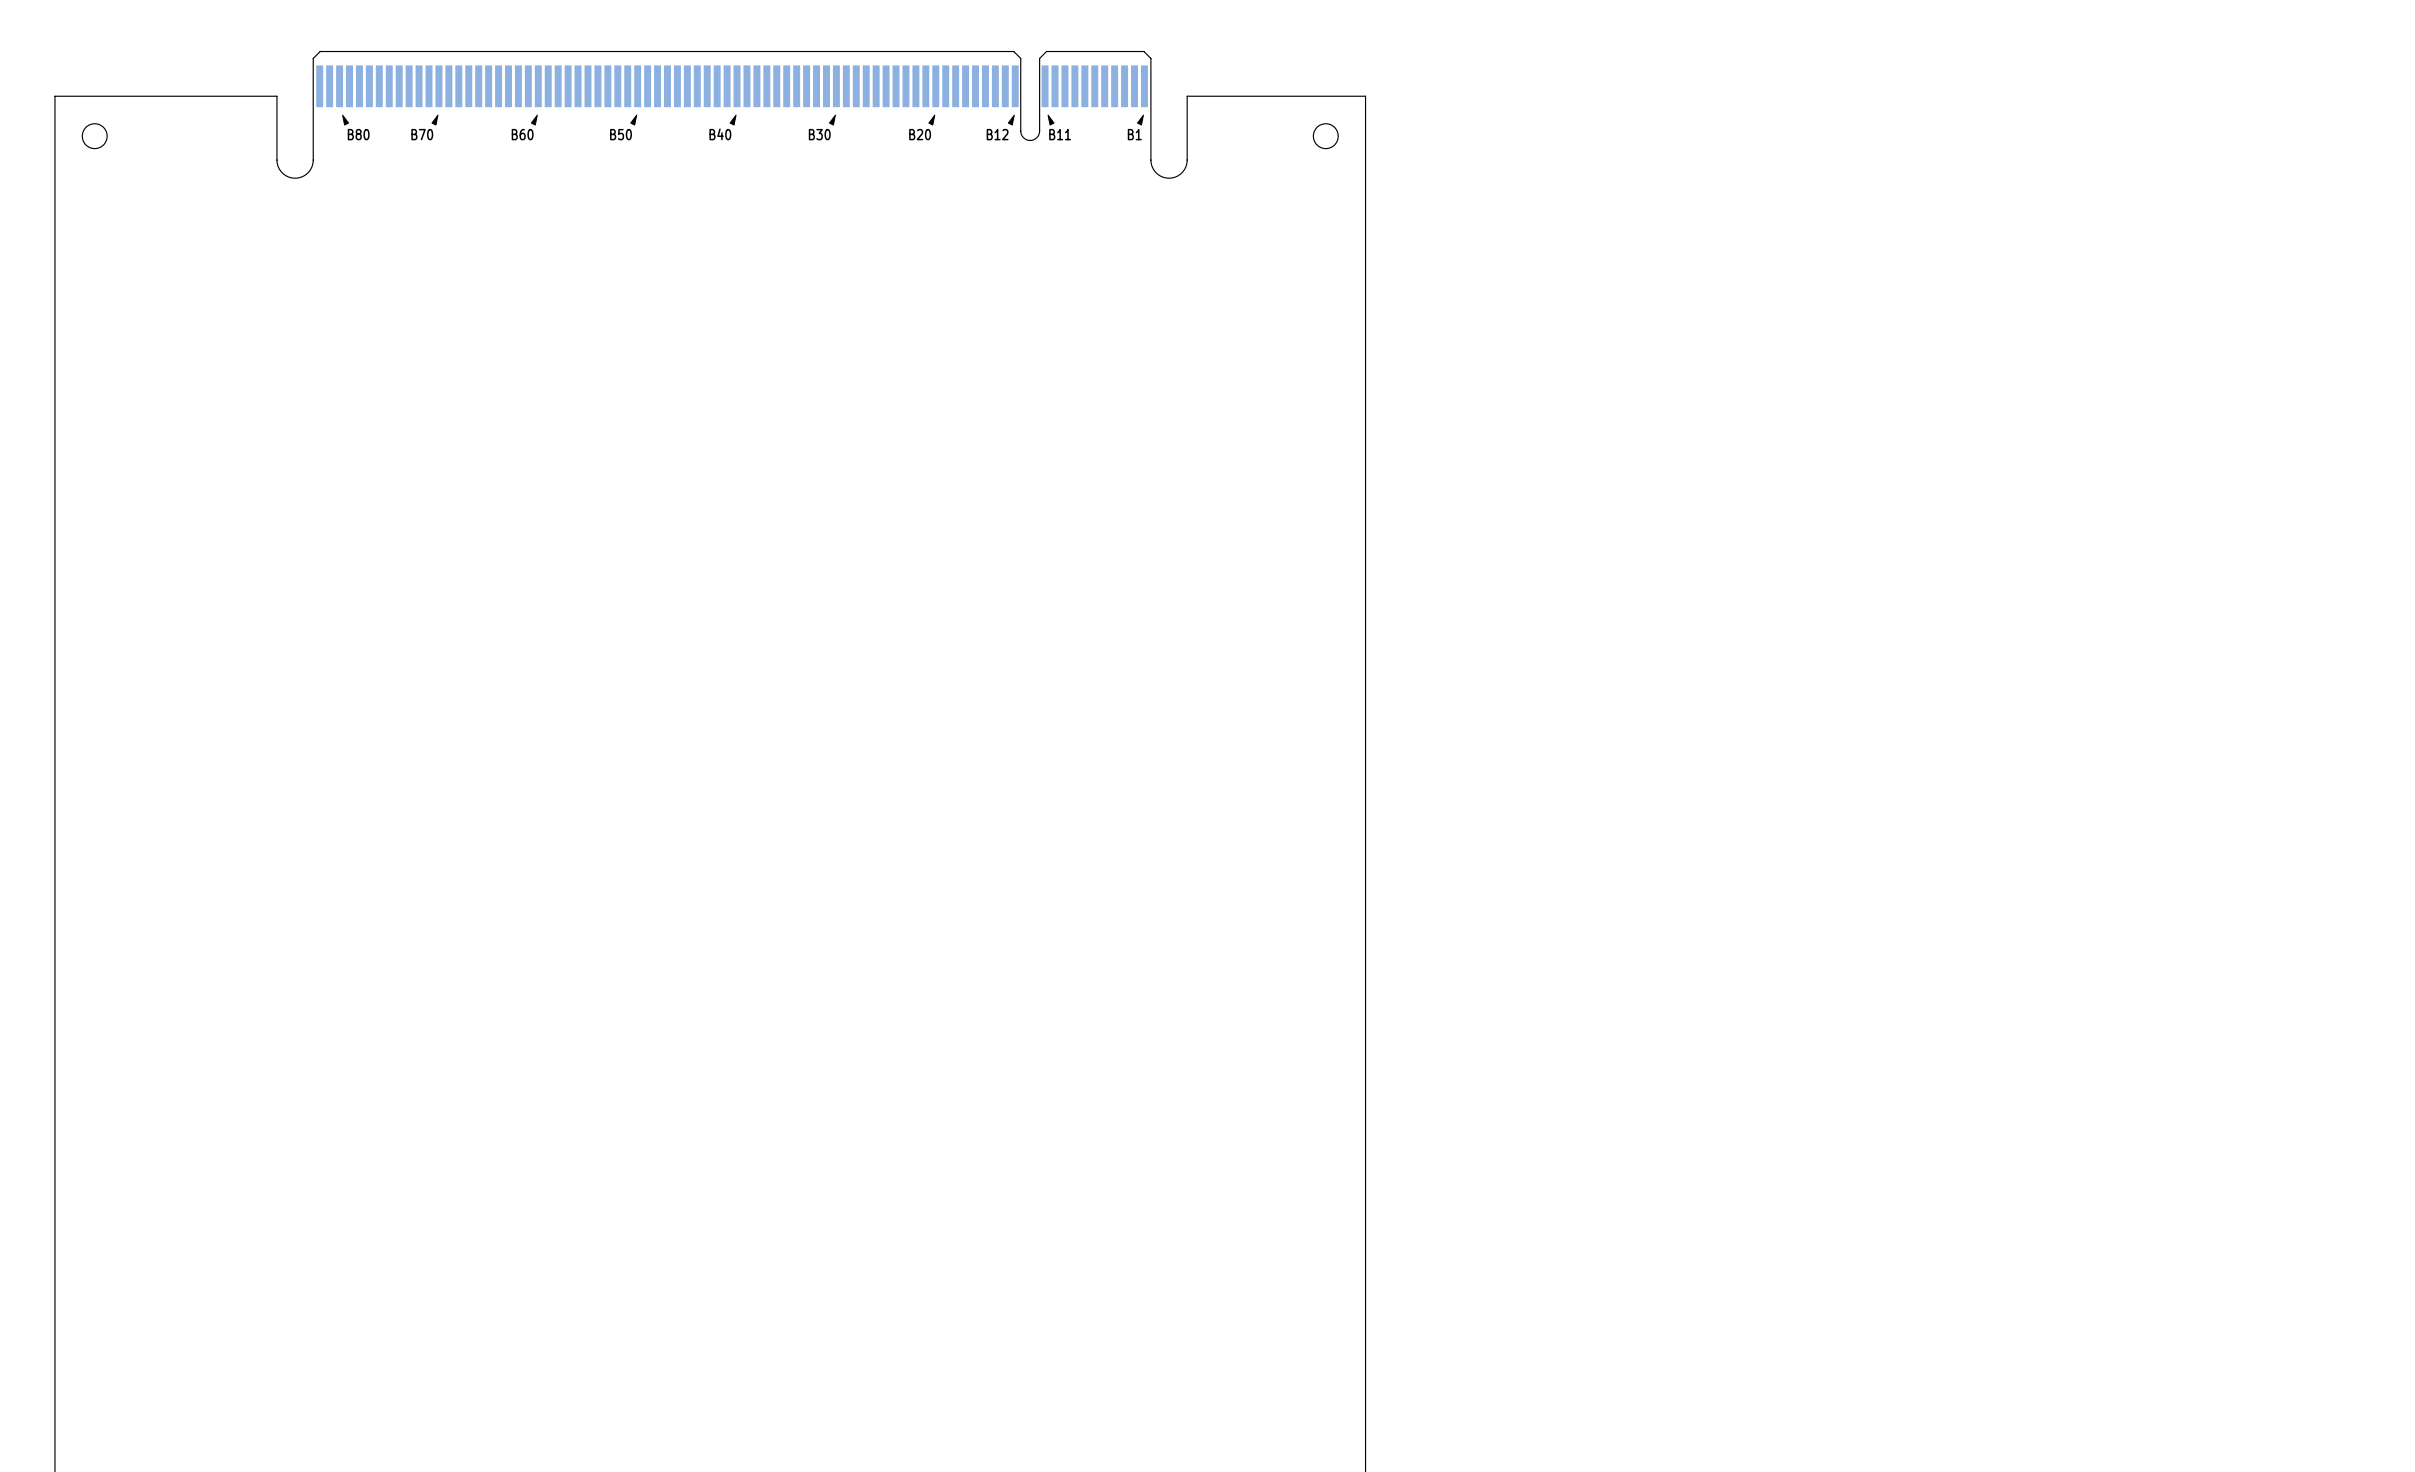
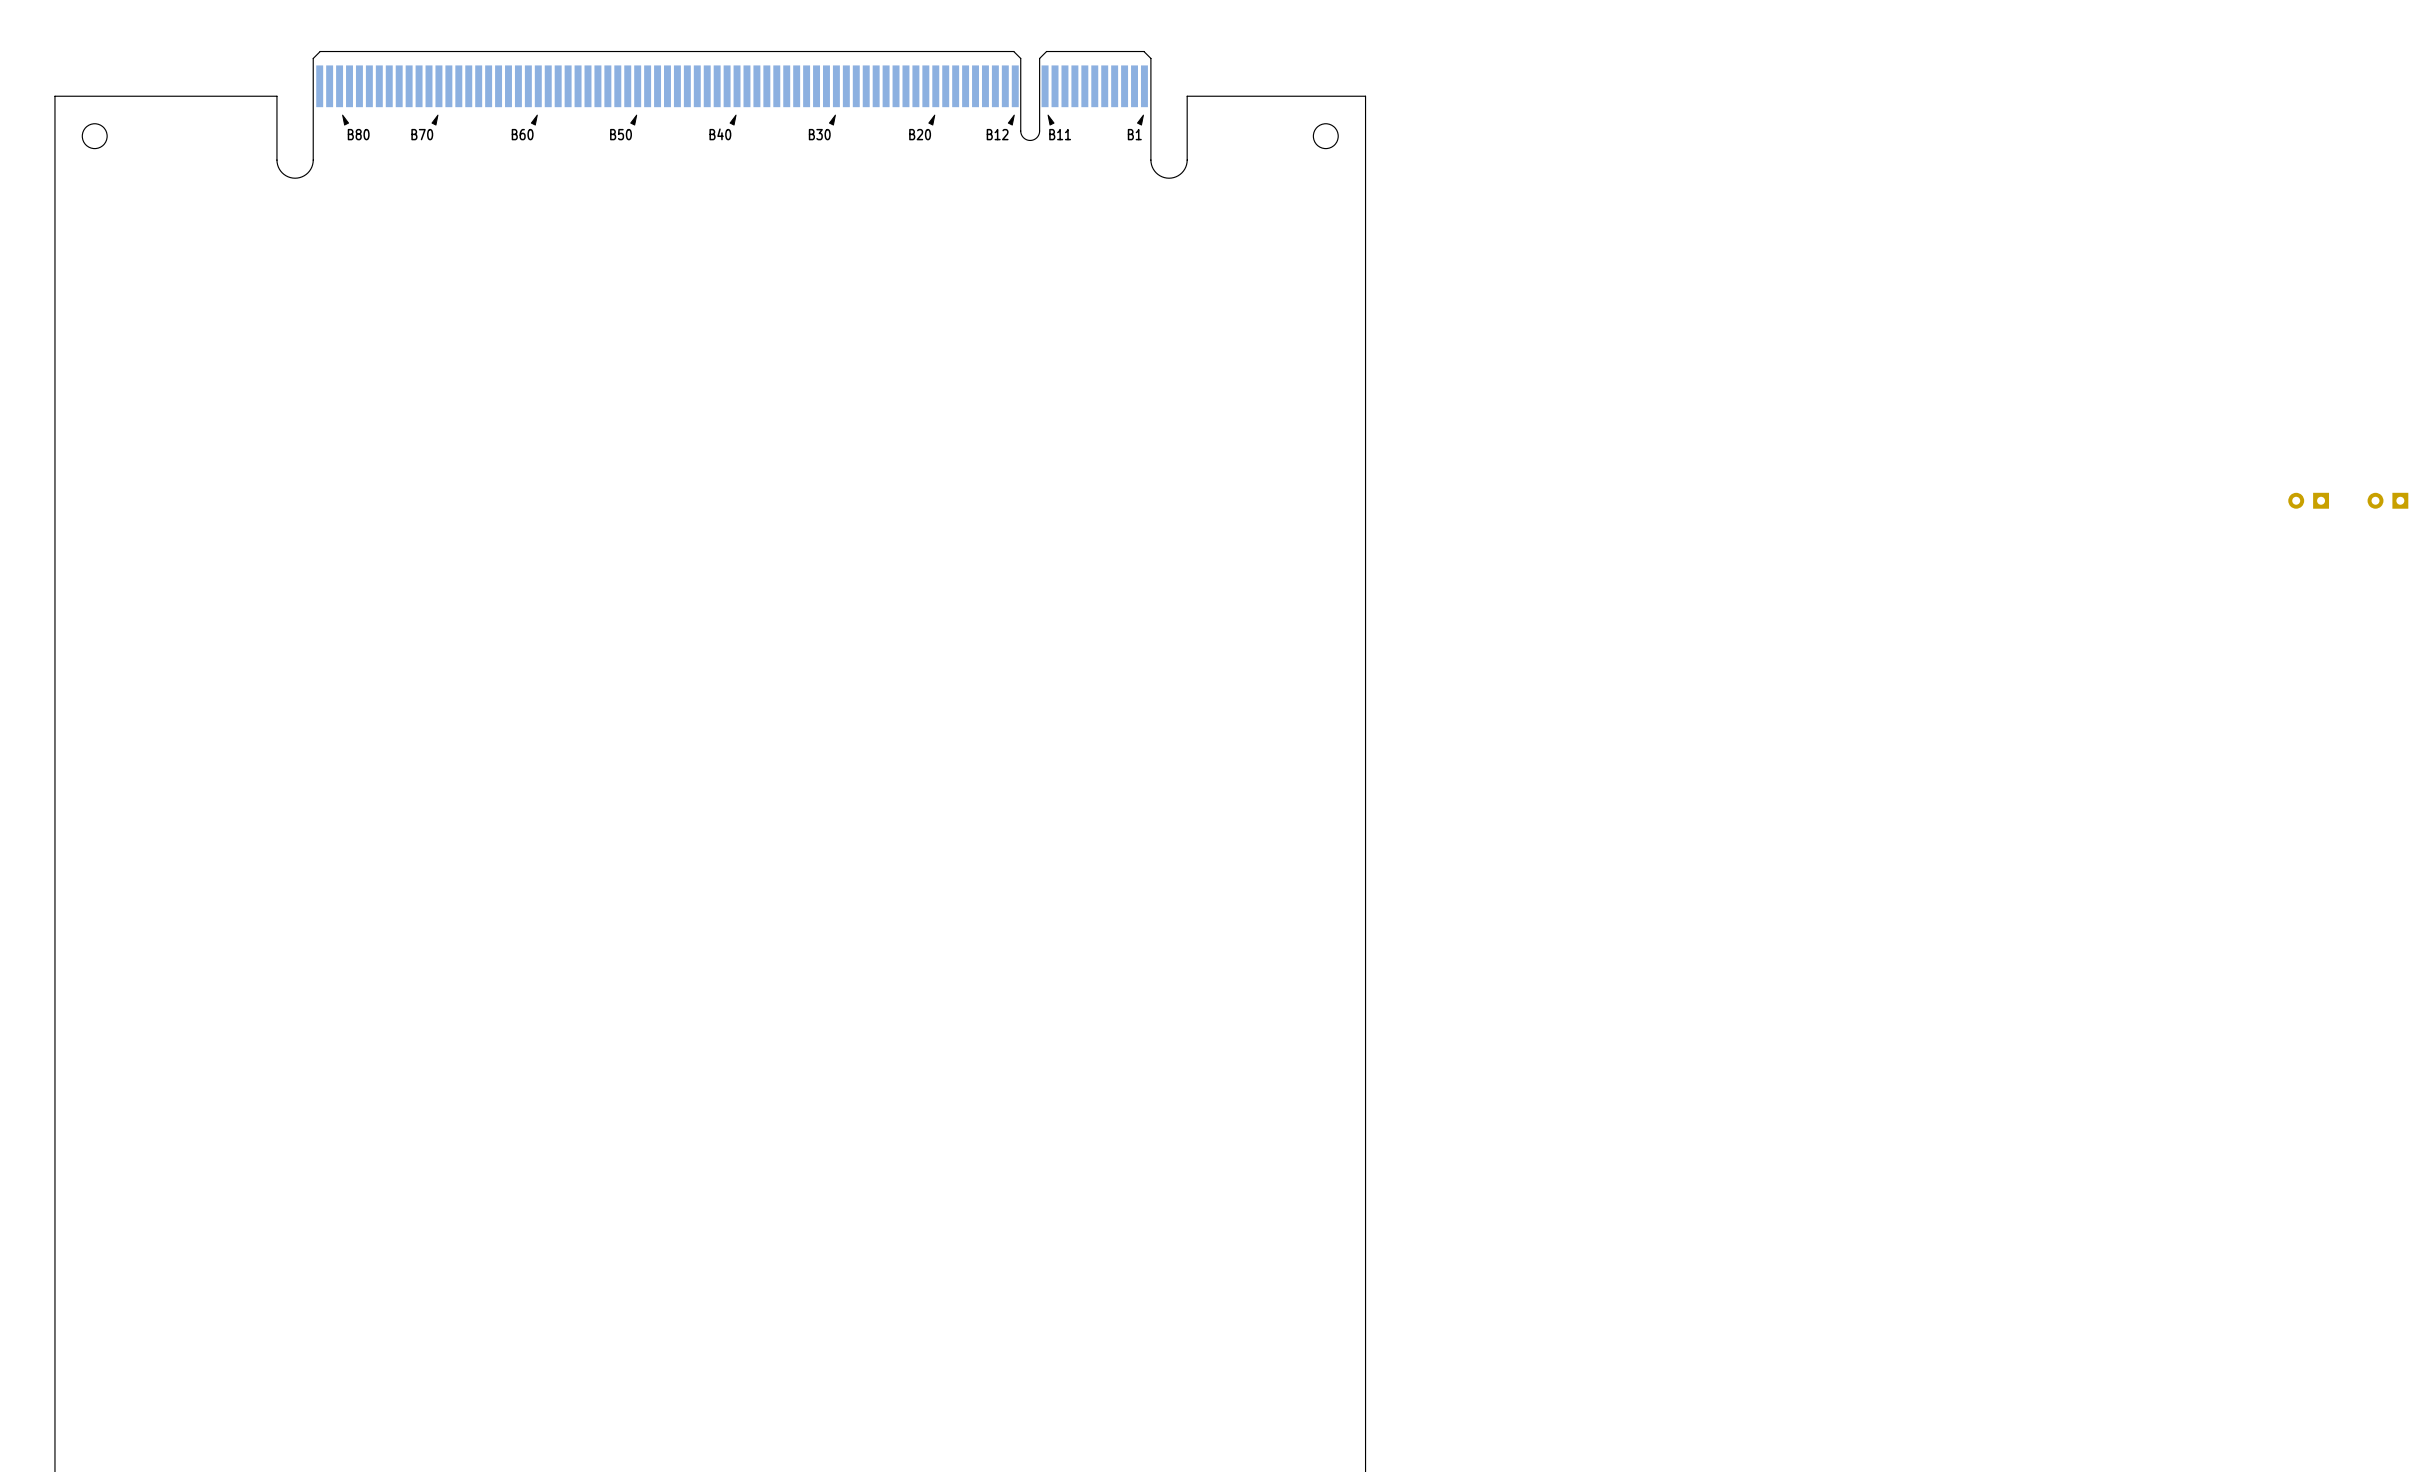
part: none -> (2308, 500)
part: none -> (2387, 500)

